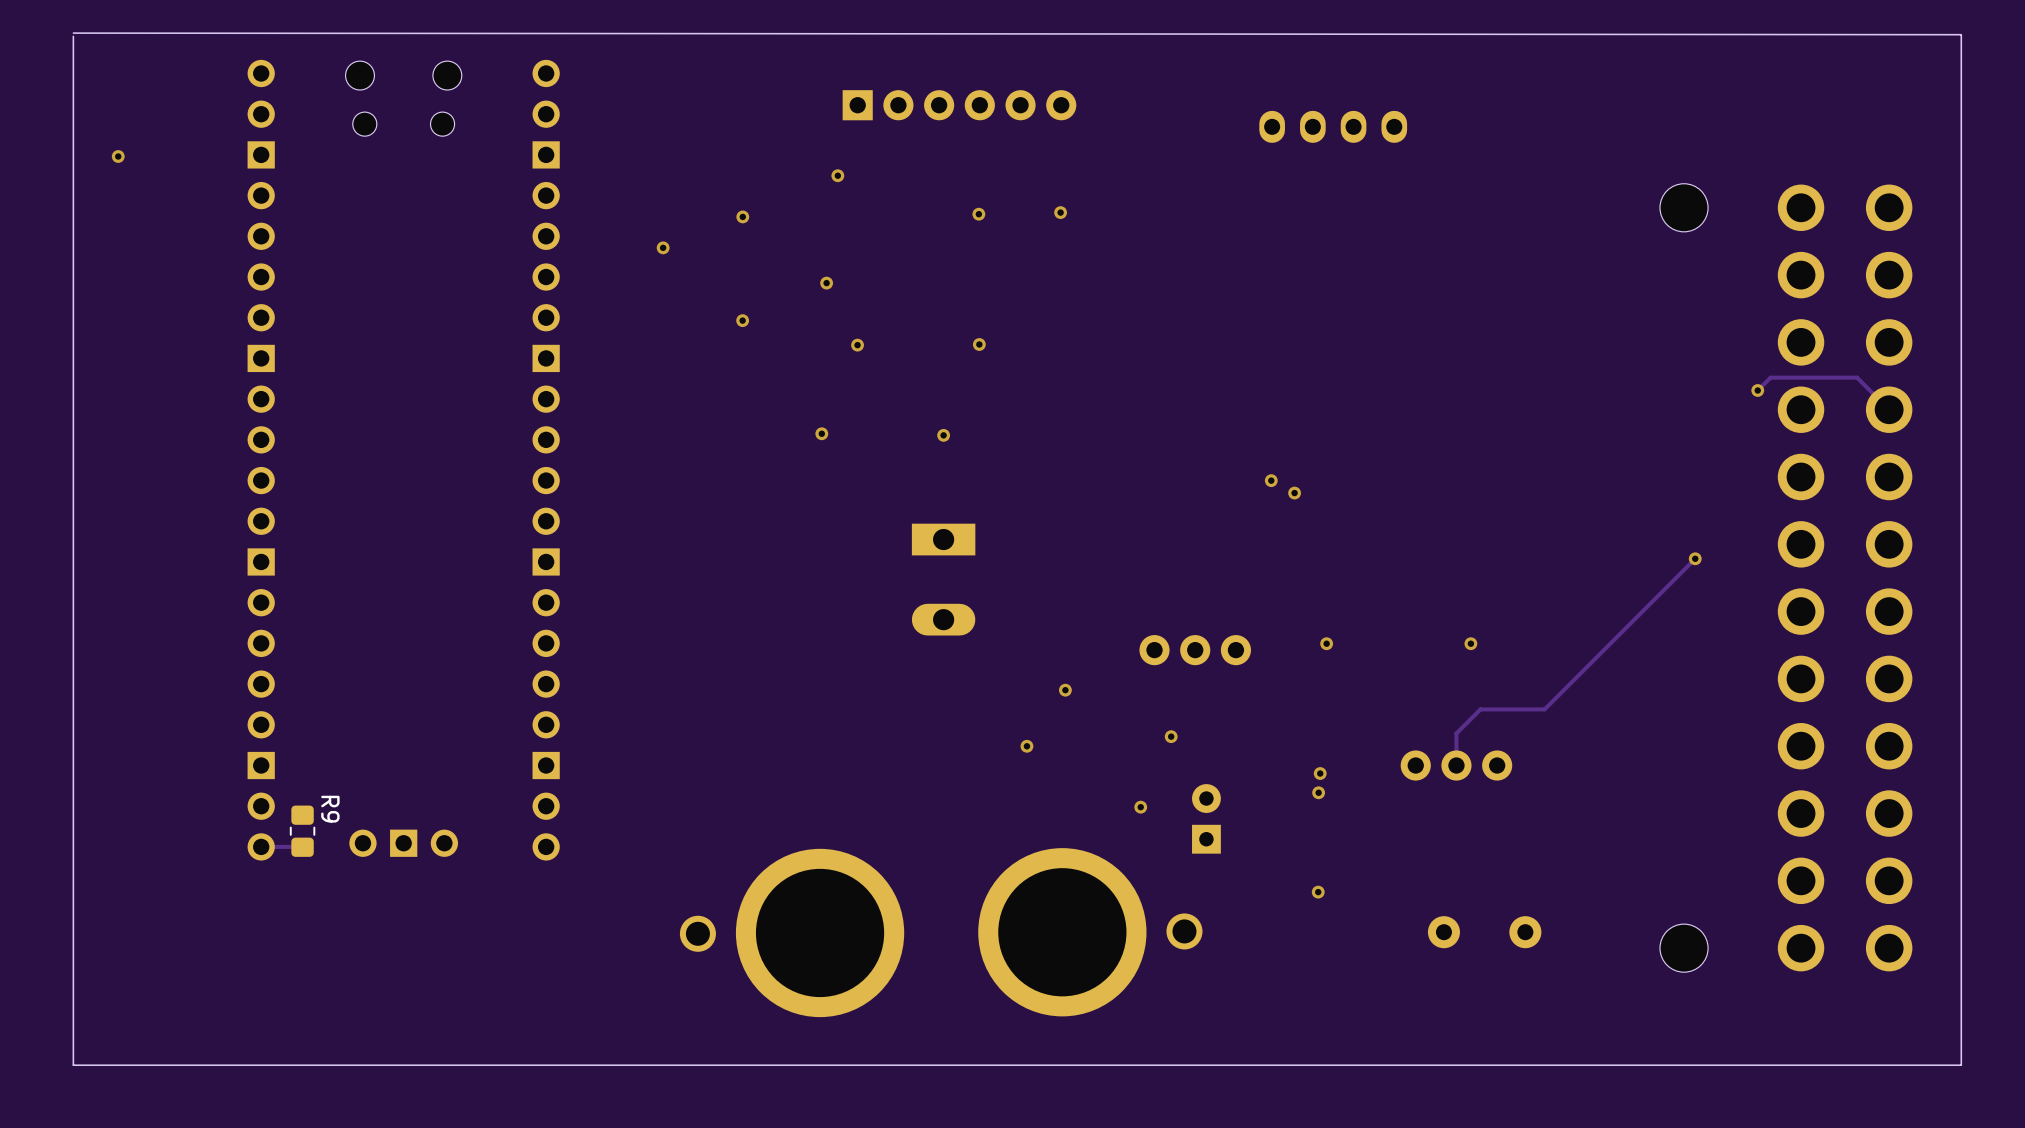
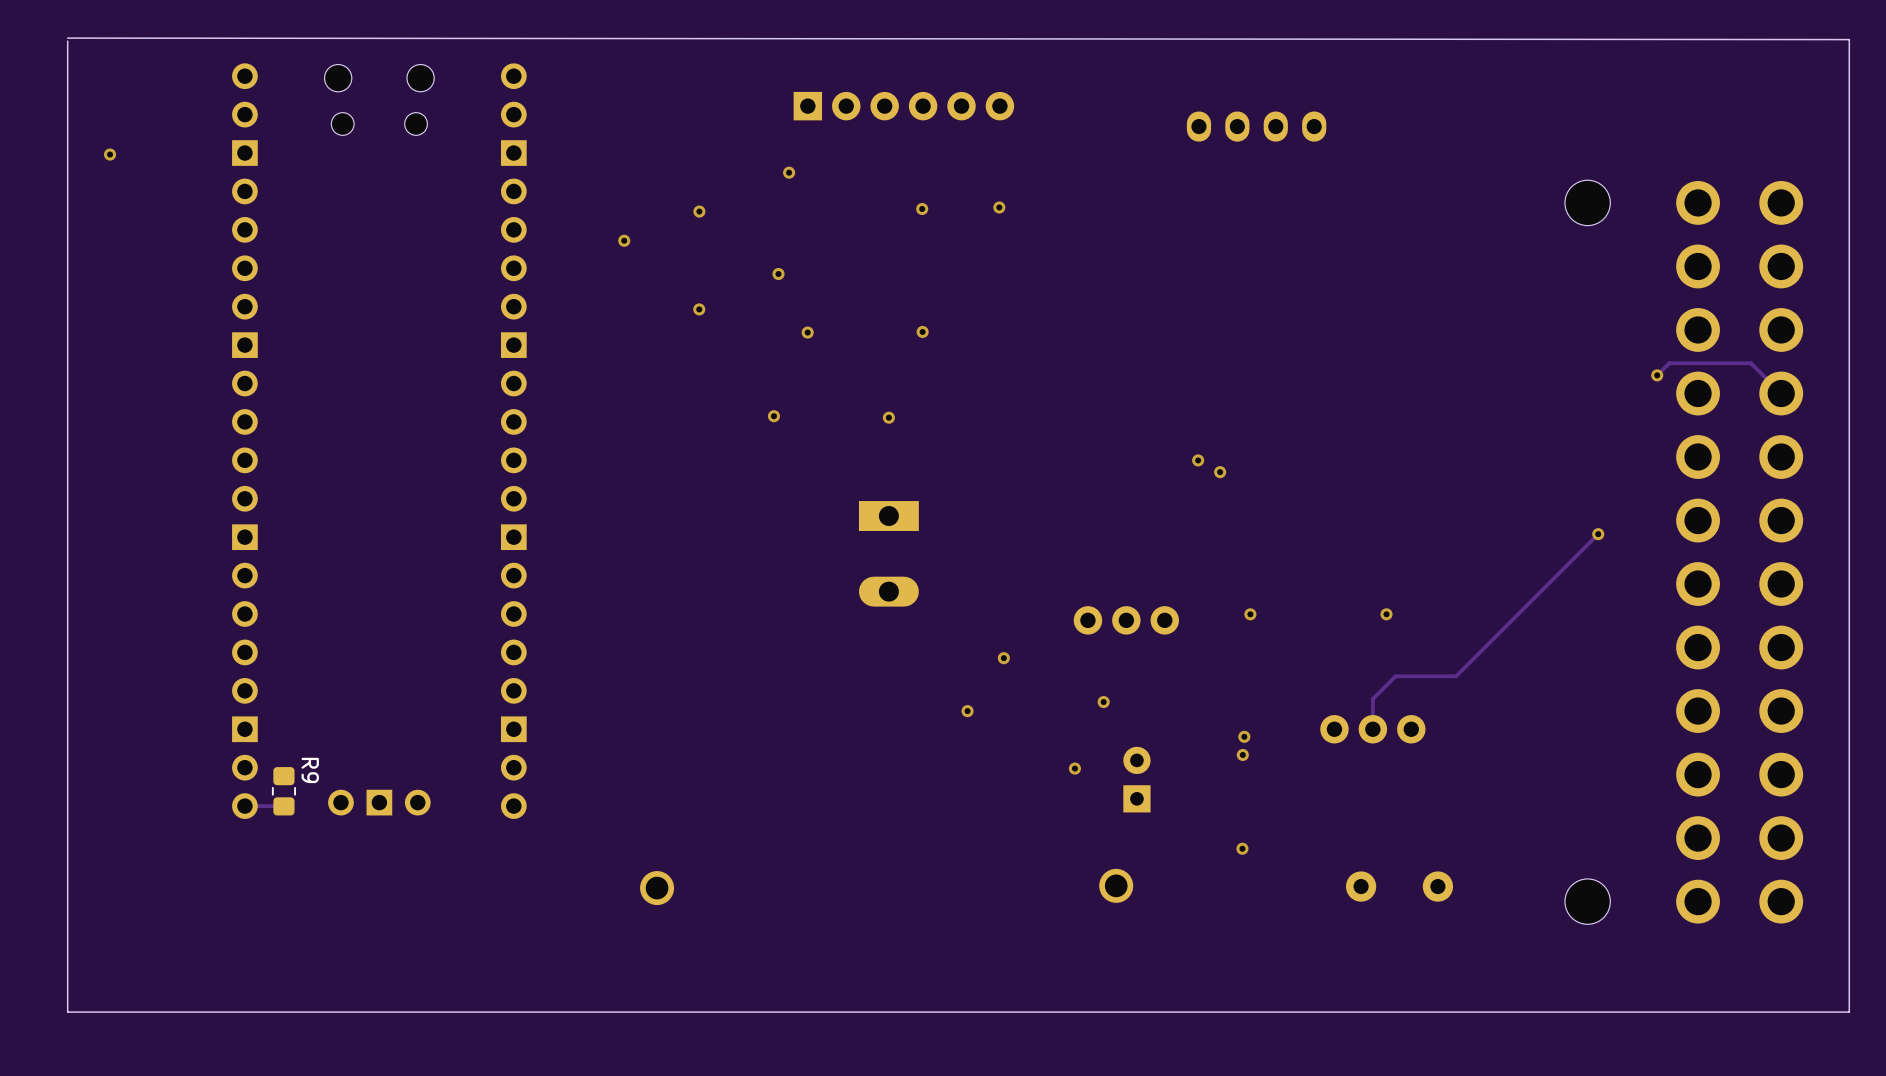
part: (792, 932) -> none
part: (1090, 932) -> none

